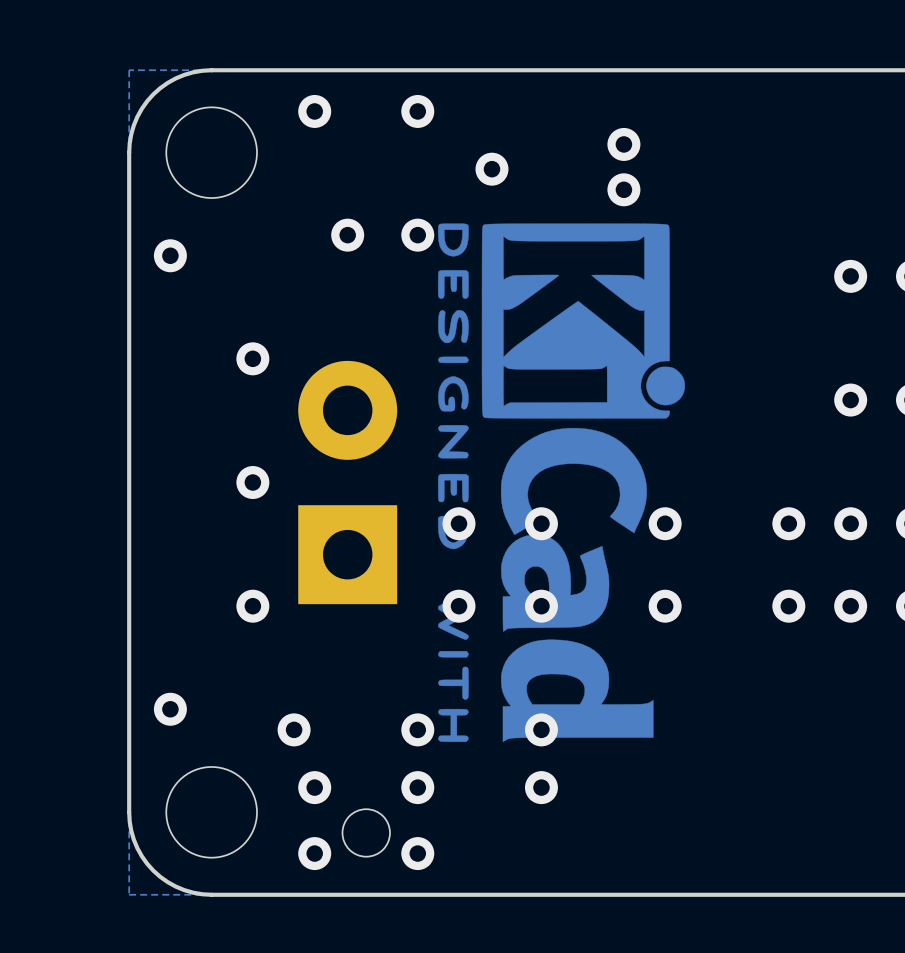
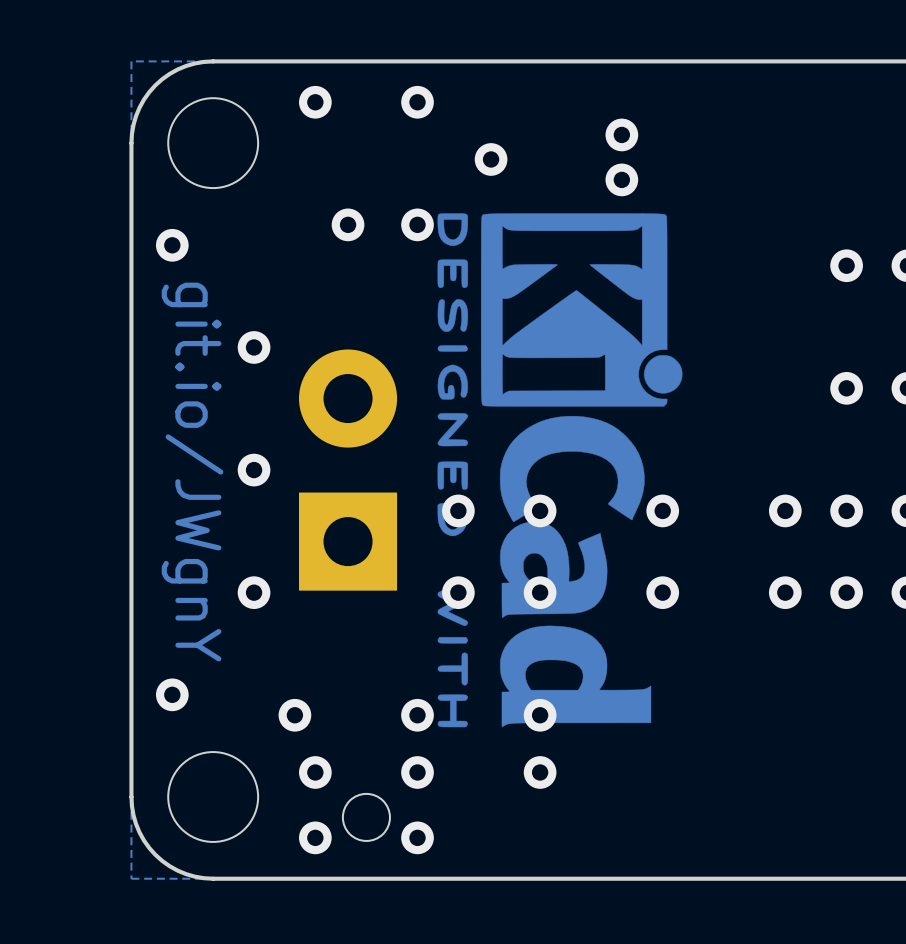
text: none -> git.io/JWgnY (192, 472)

